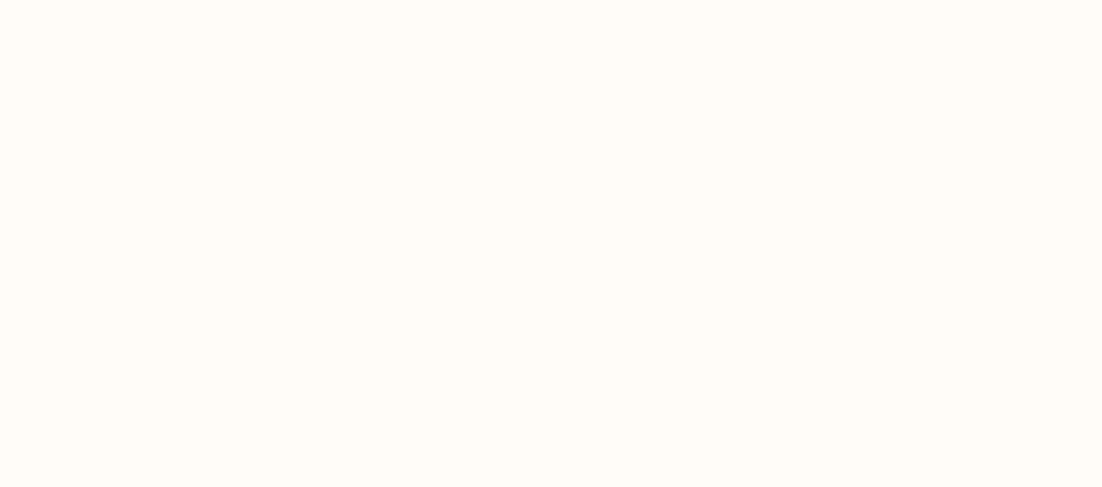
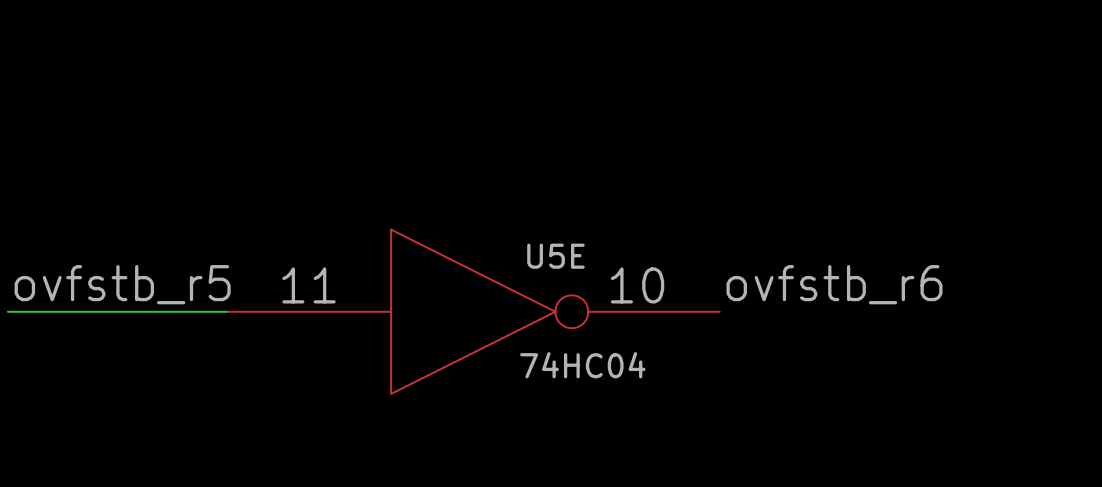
label: none -> ovfstb_r5 (122, 284)
label: none -> ovfstb_r6 (834, 284)
wire: none -> (7, 311) (226, 311)
U5E: none -> 74HC04 (473, 311)

